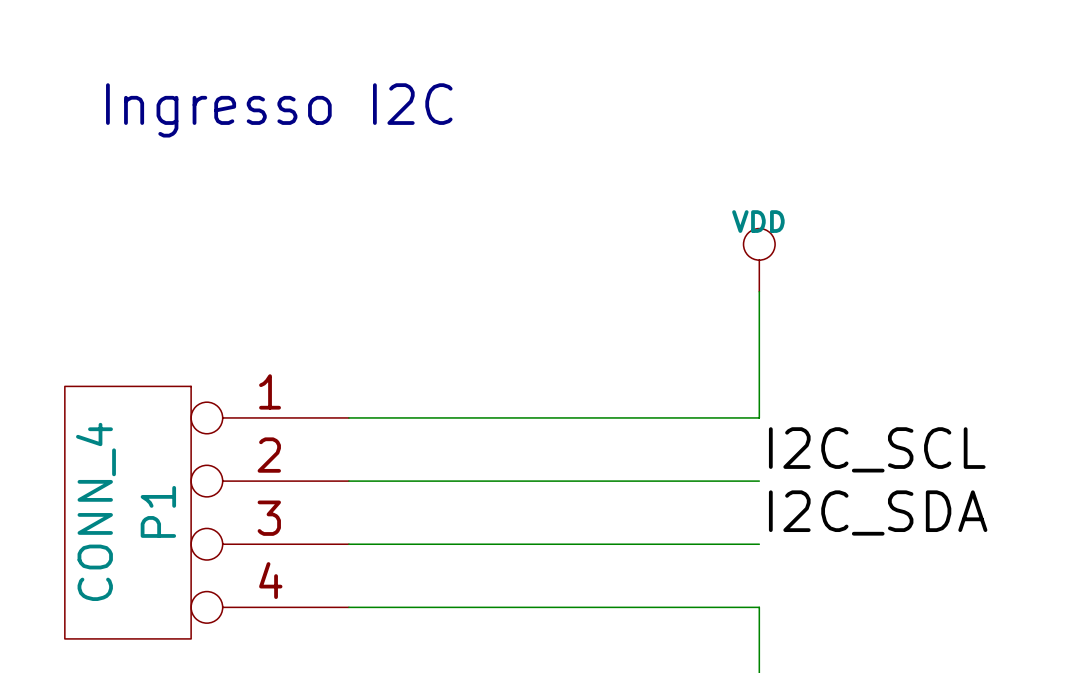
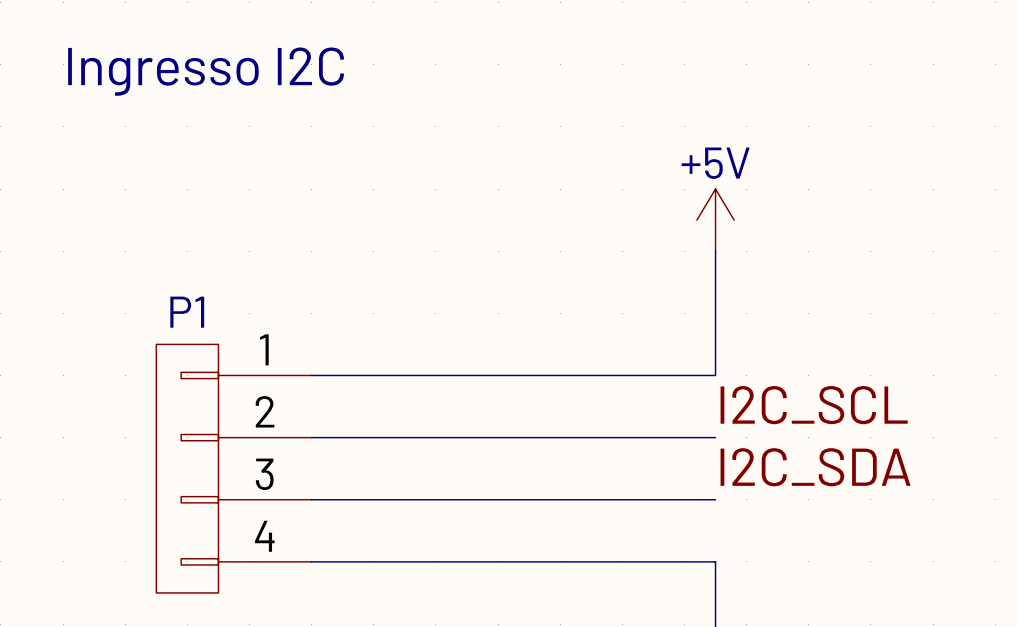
power symbol: VDD (759, 260) -> +5V (715, 220)
P1 symbol: [64, 386, 349, 639] -> [156, 344, 312, 593]
P1 value: CONN_4 (95, 511) -> none
P1 name position: P1 (158, 511) -> P1 (187, 312)

